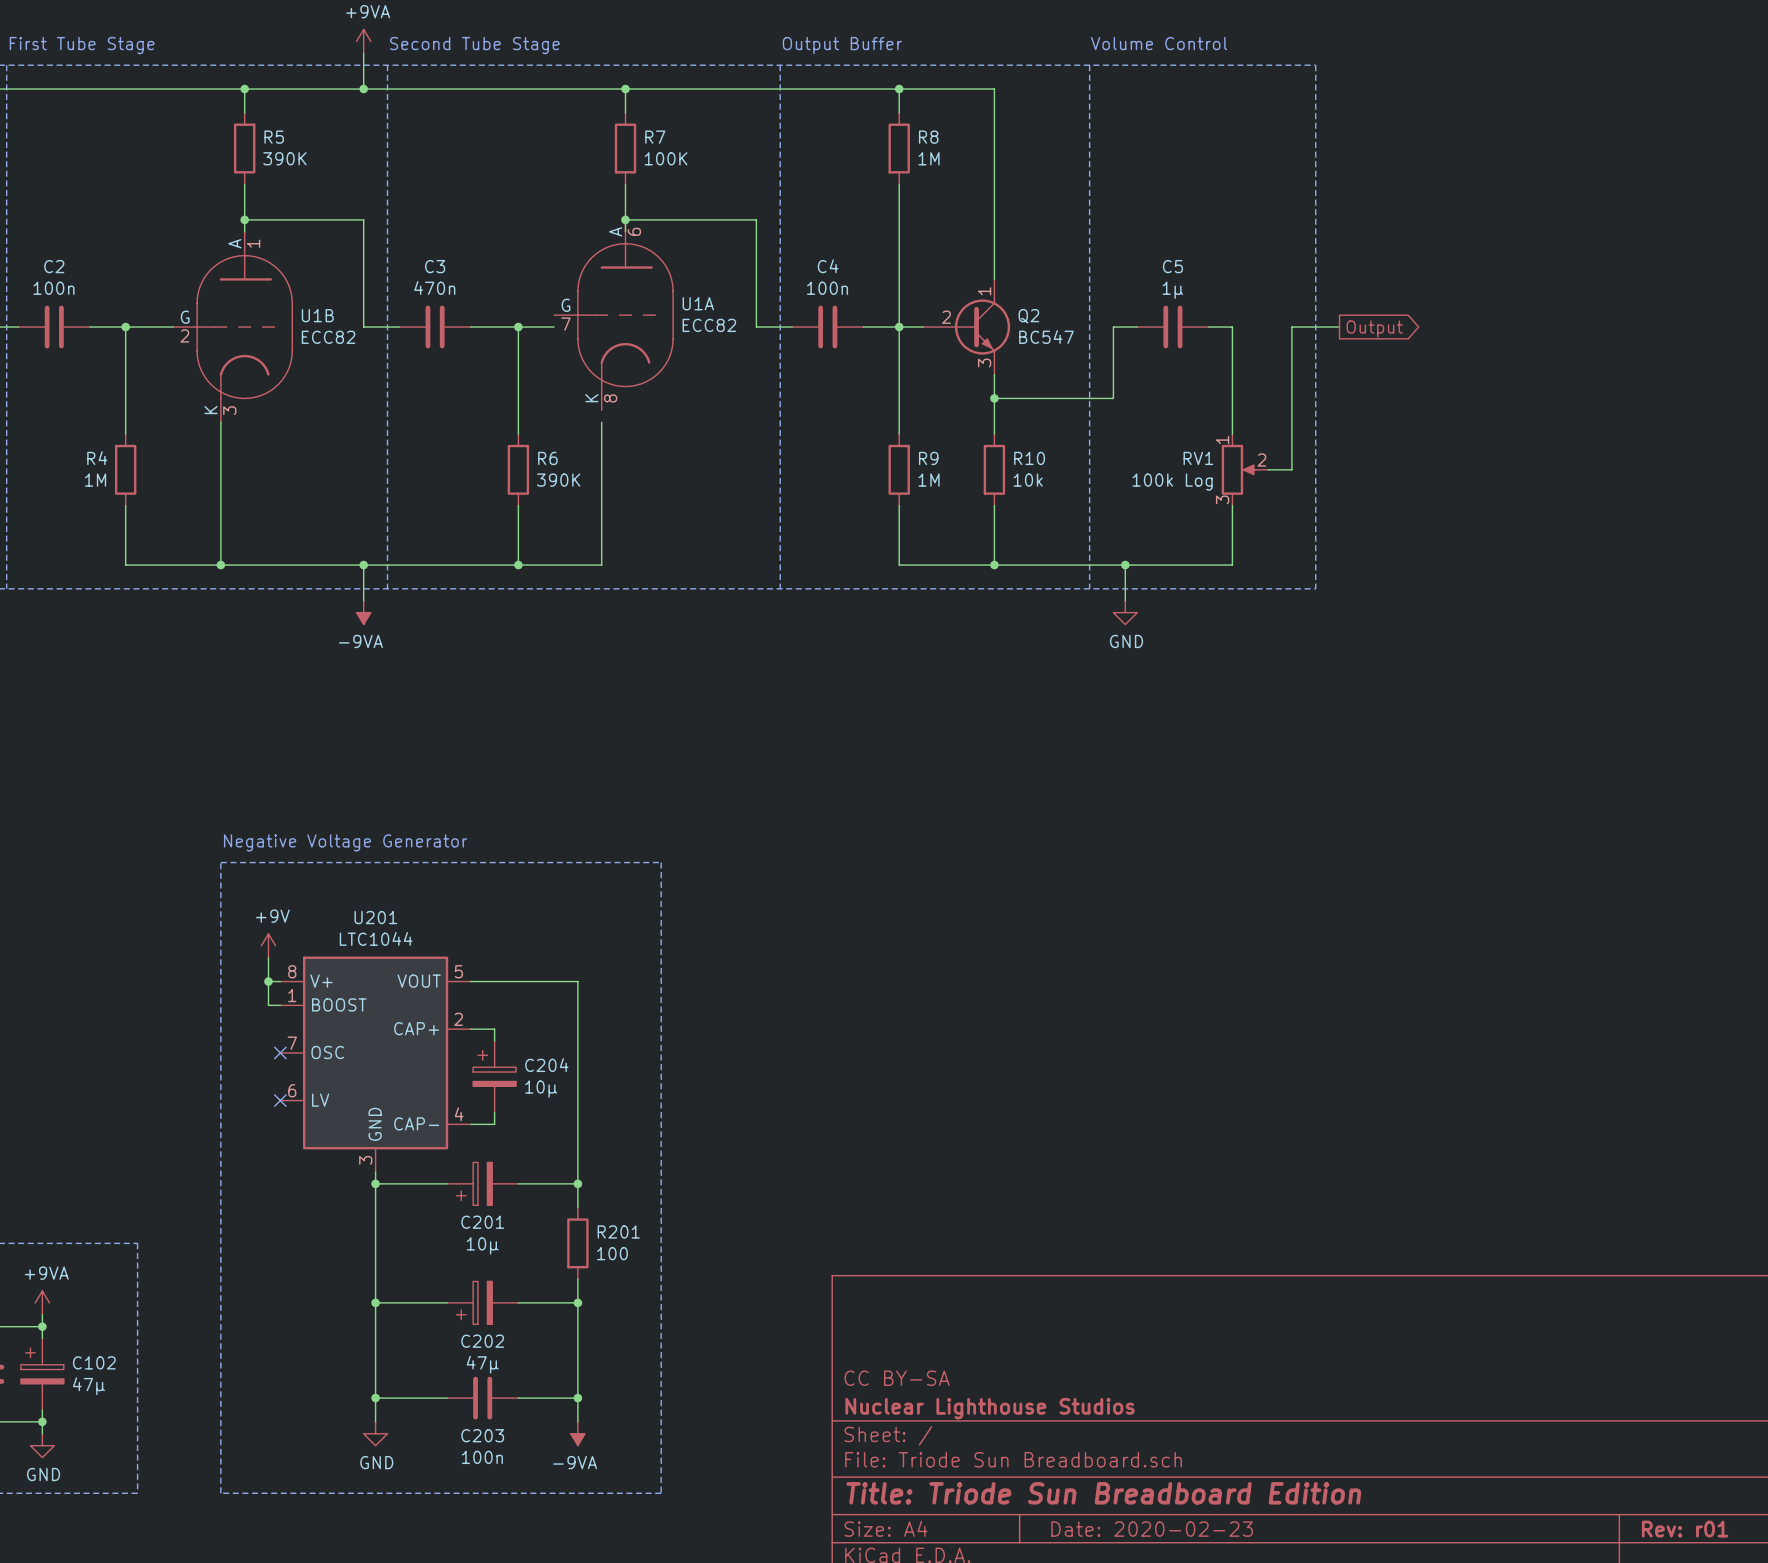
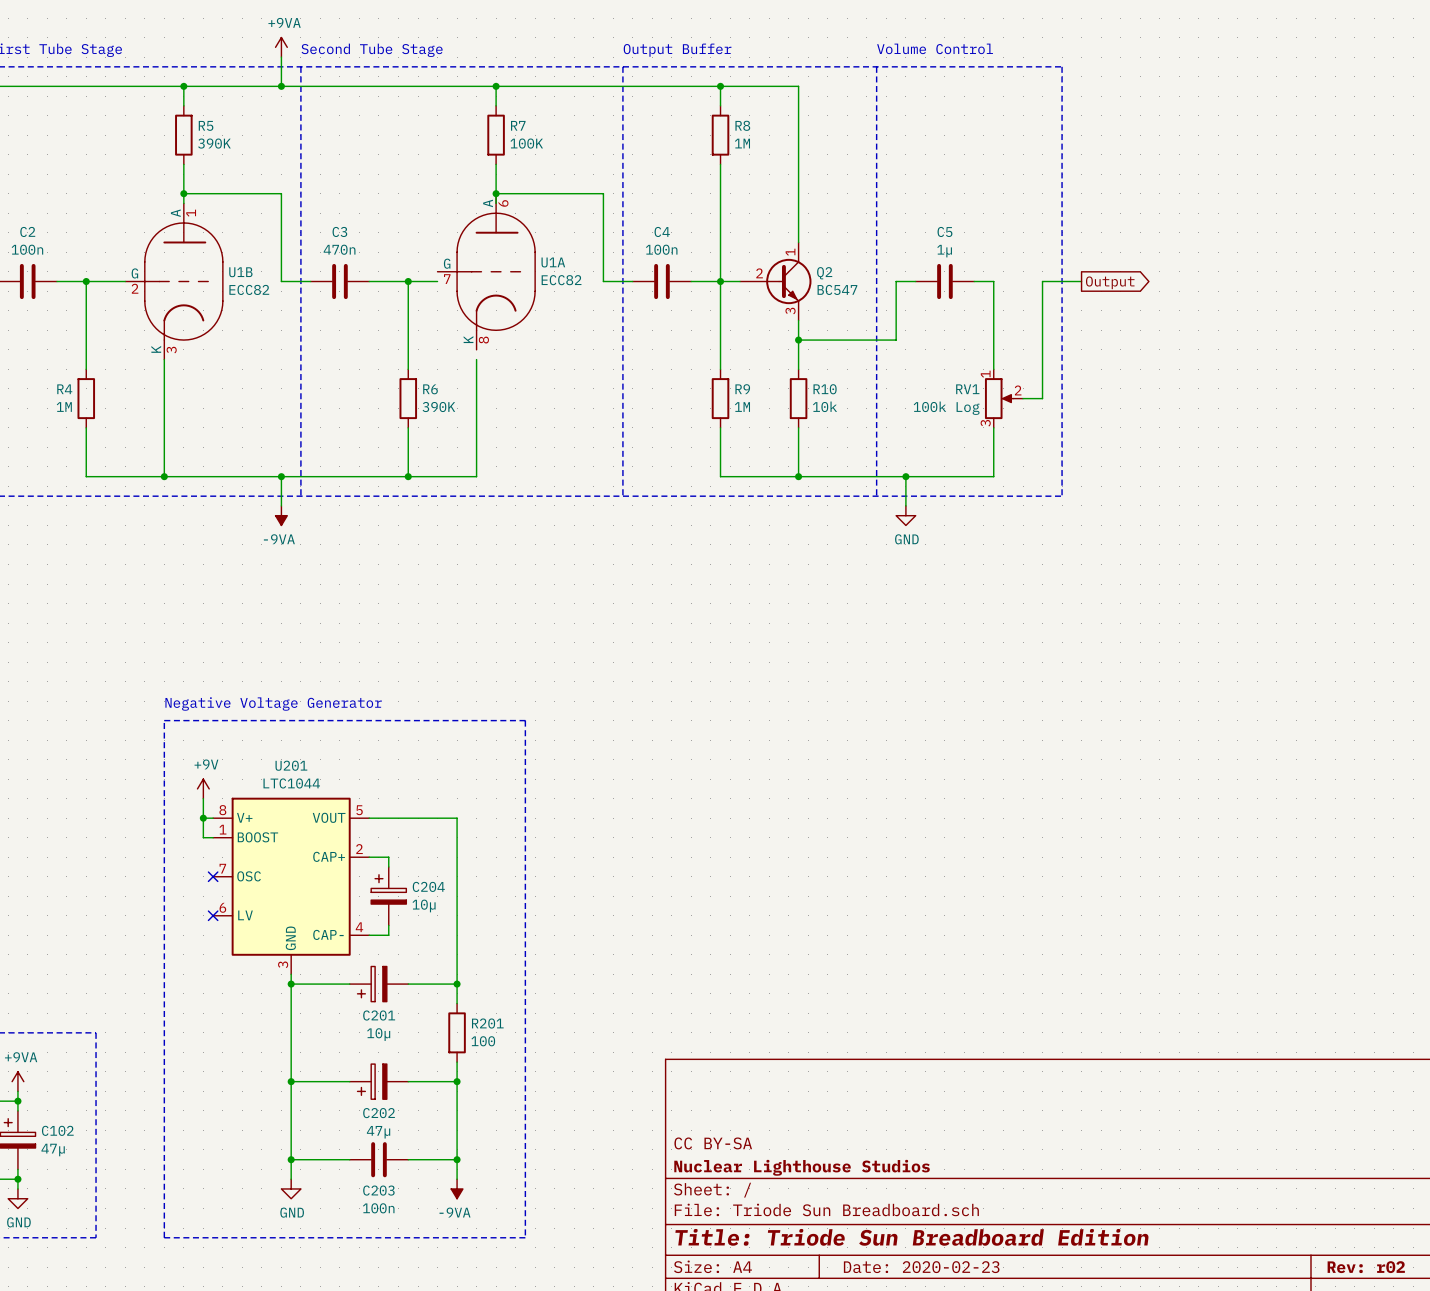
title block: Rev: r01 (1685, 1529) -> Rev: r02 (1366, 1267)

